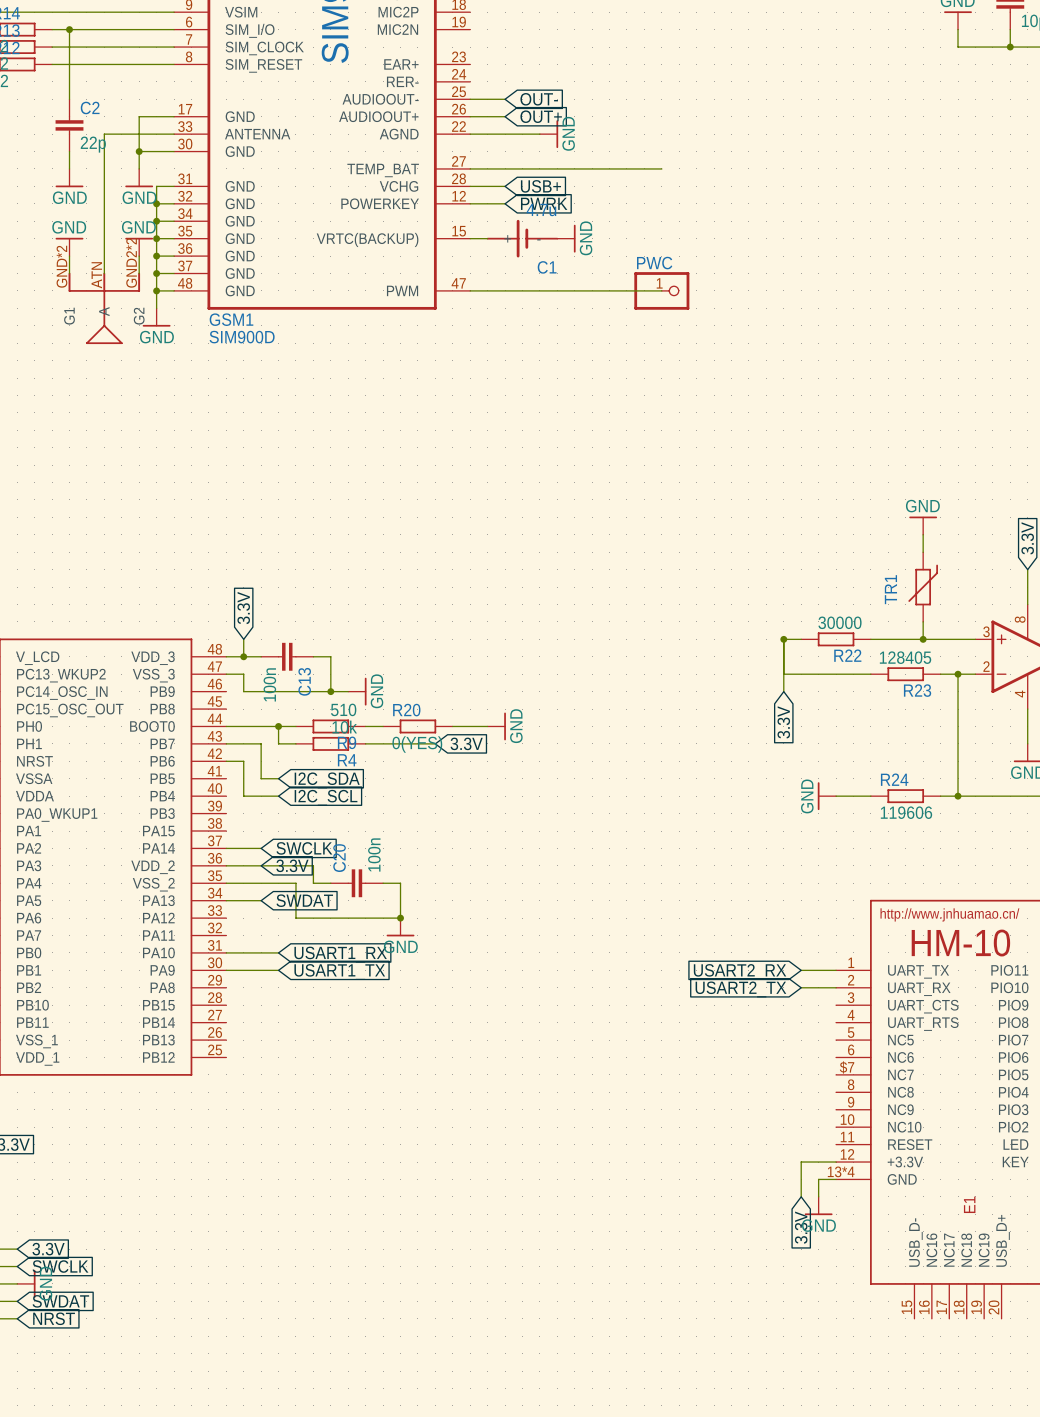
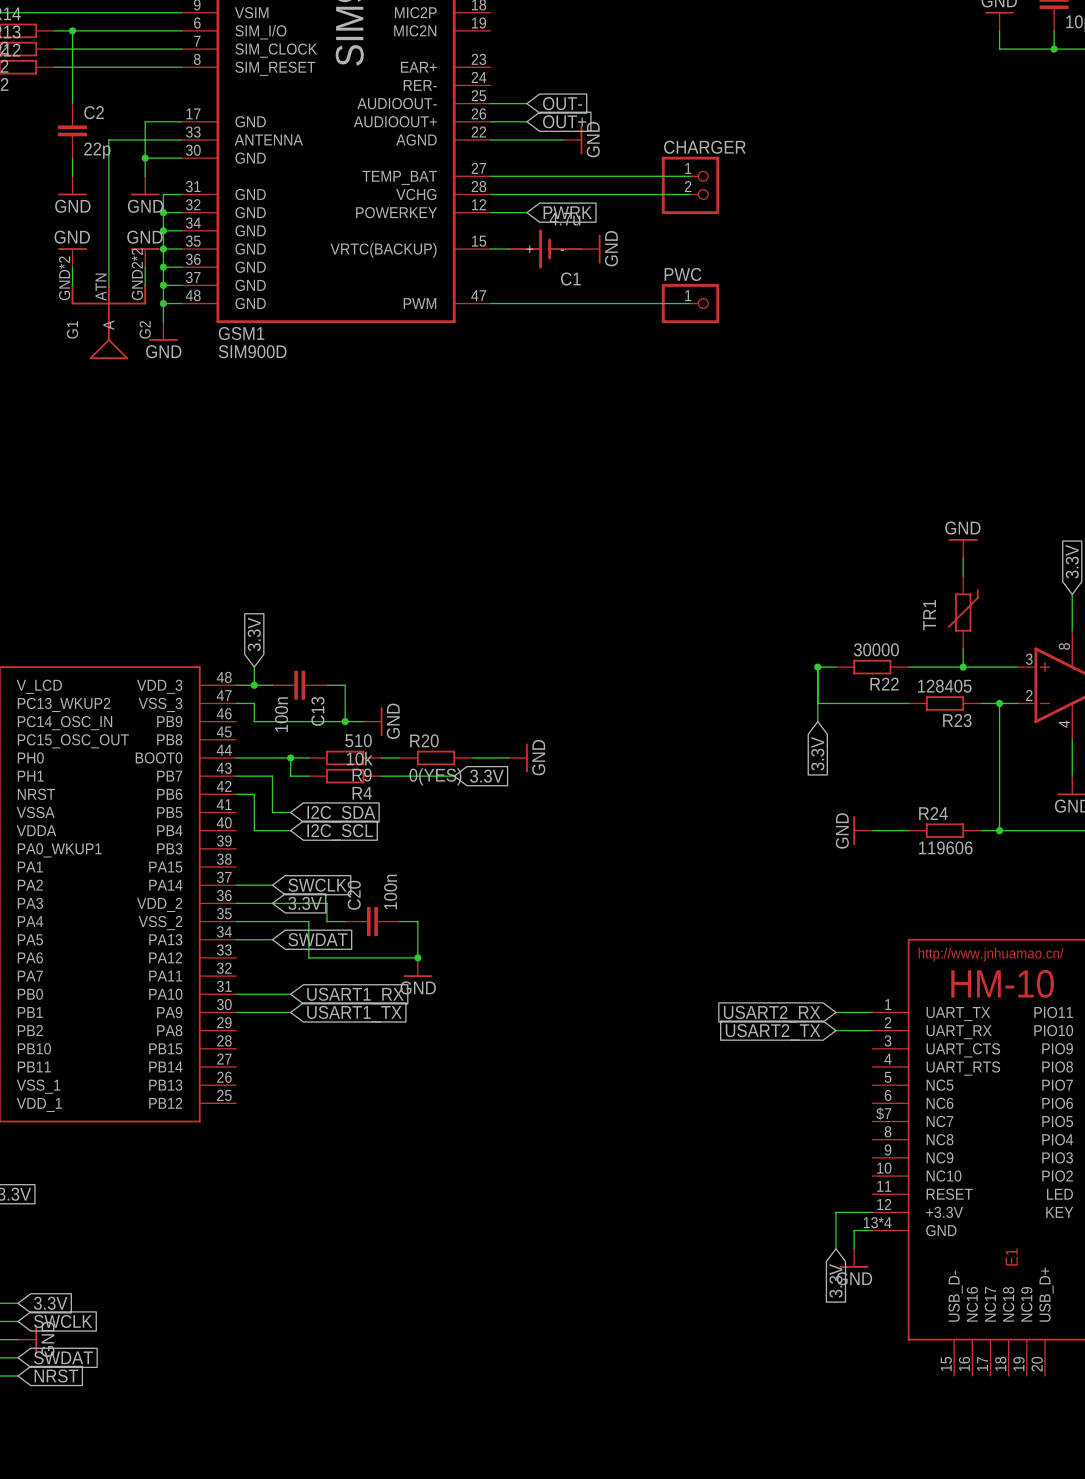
CHARGER: none -> (690, 185)
wire: none -> (526, 194) (690, 194)
global label: USB+ (540, 186) -> none

